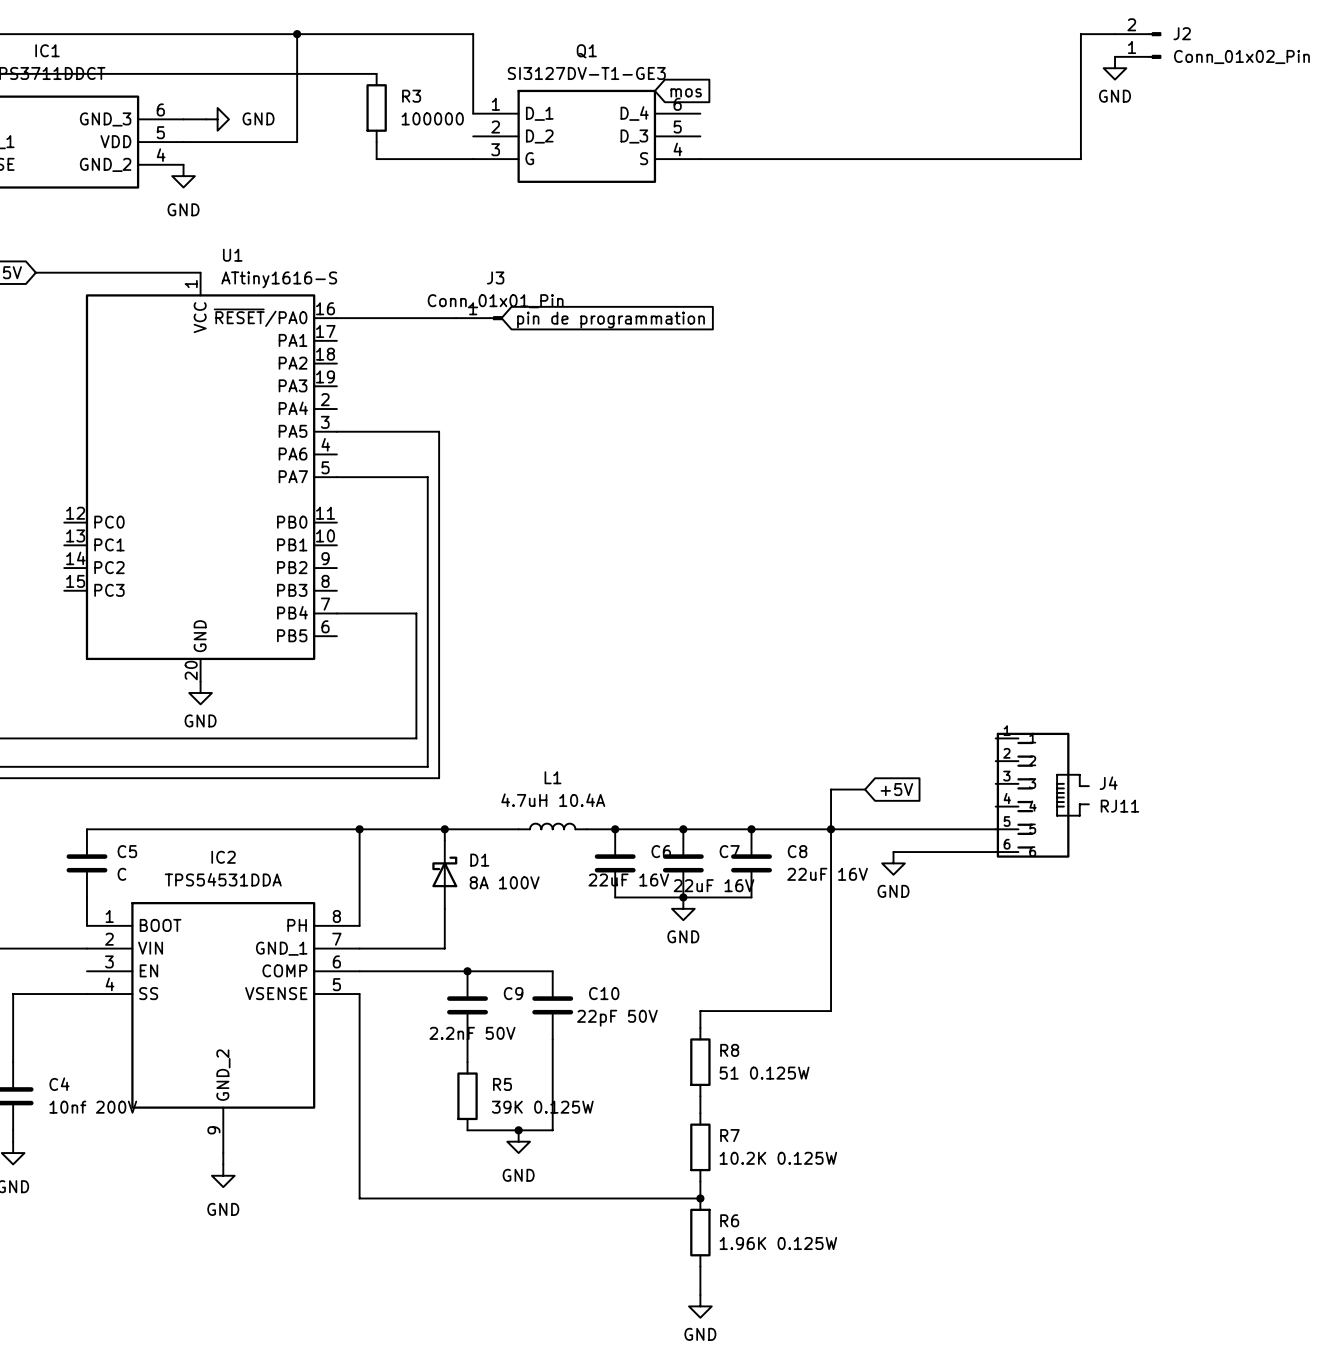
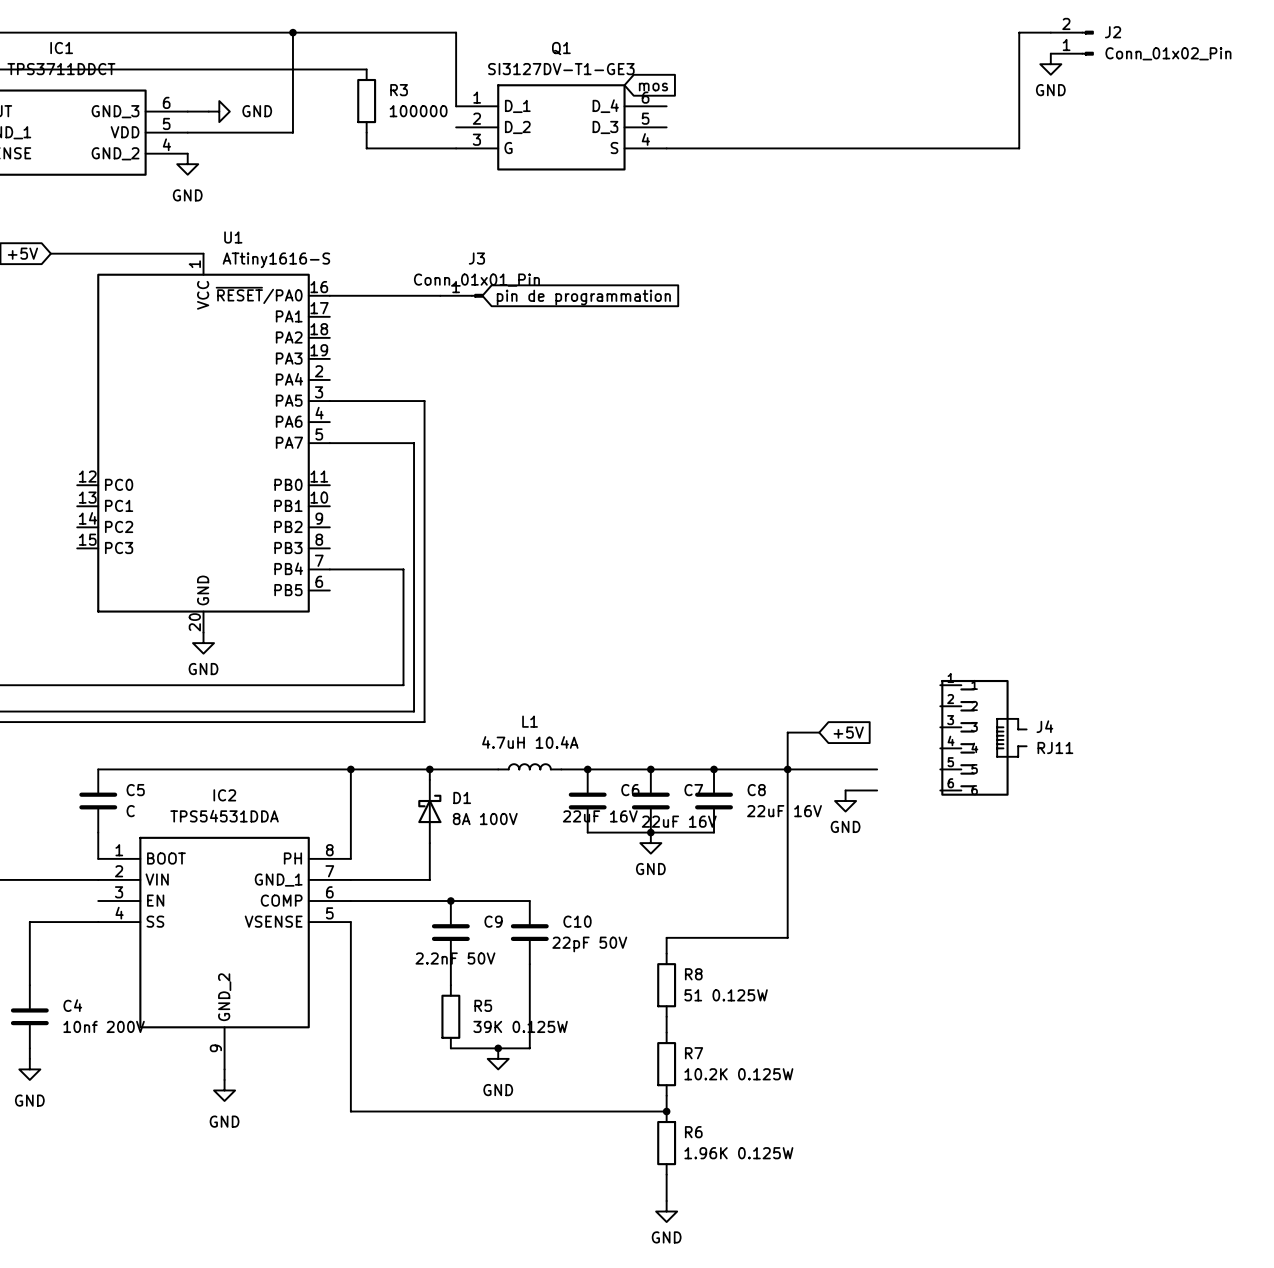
wire: (927, 829) (995, 829) -> none
wire: (927, 852) (995, 852) -> none

